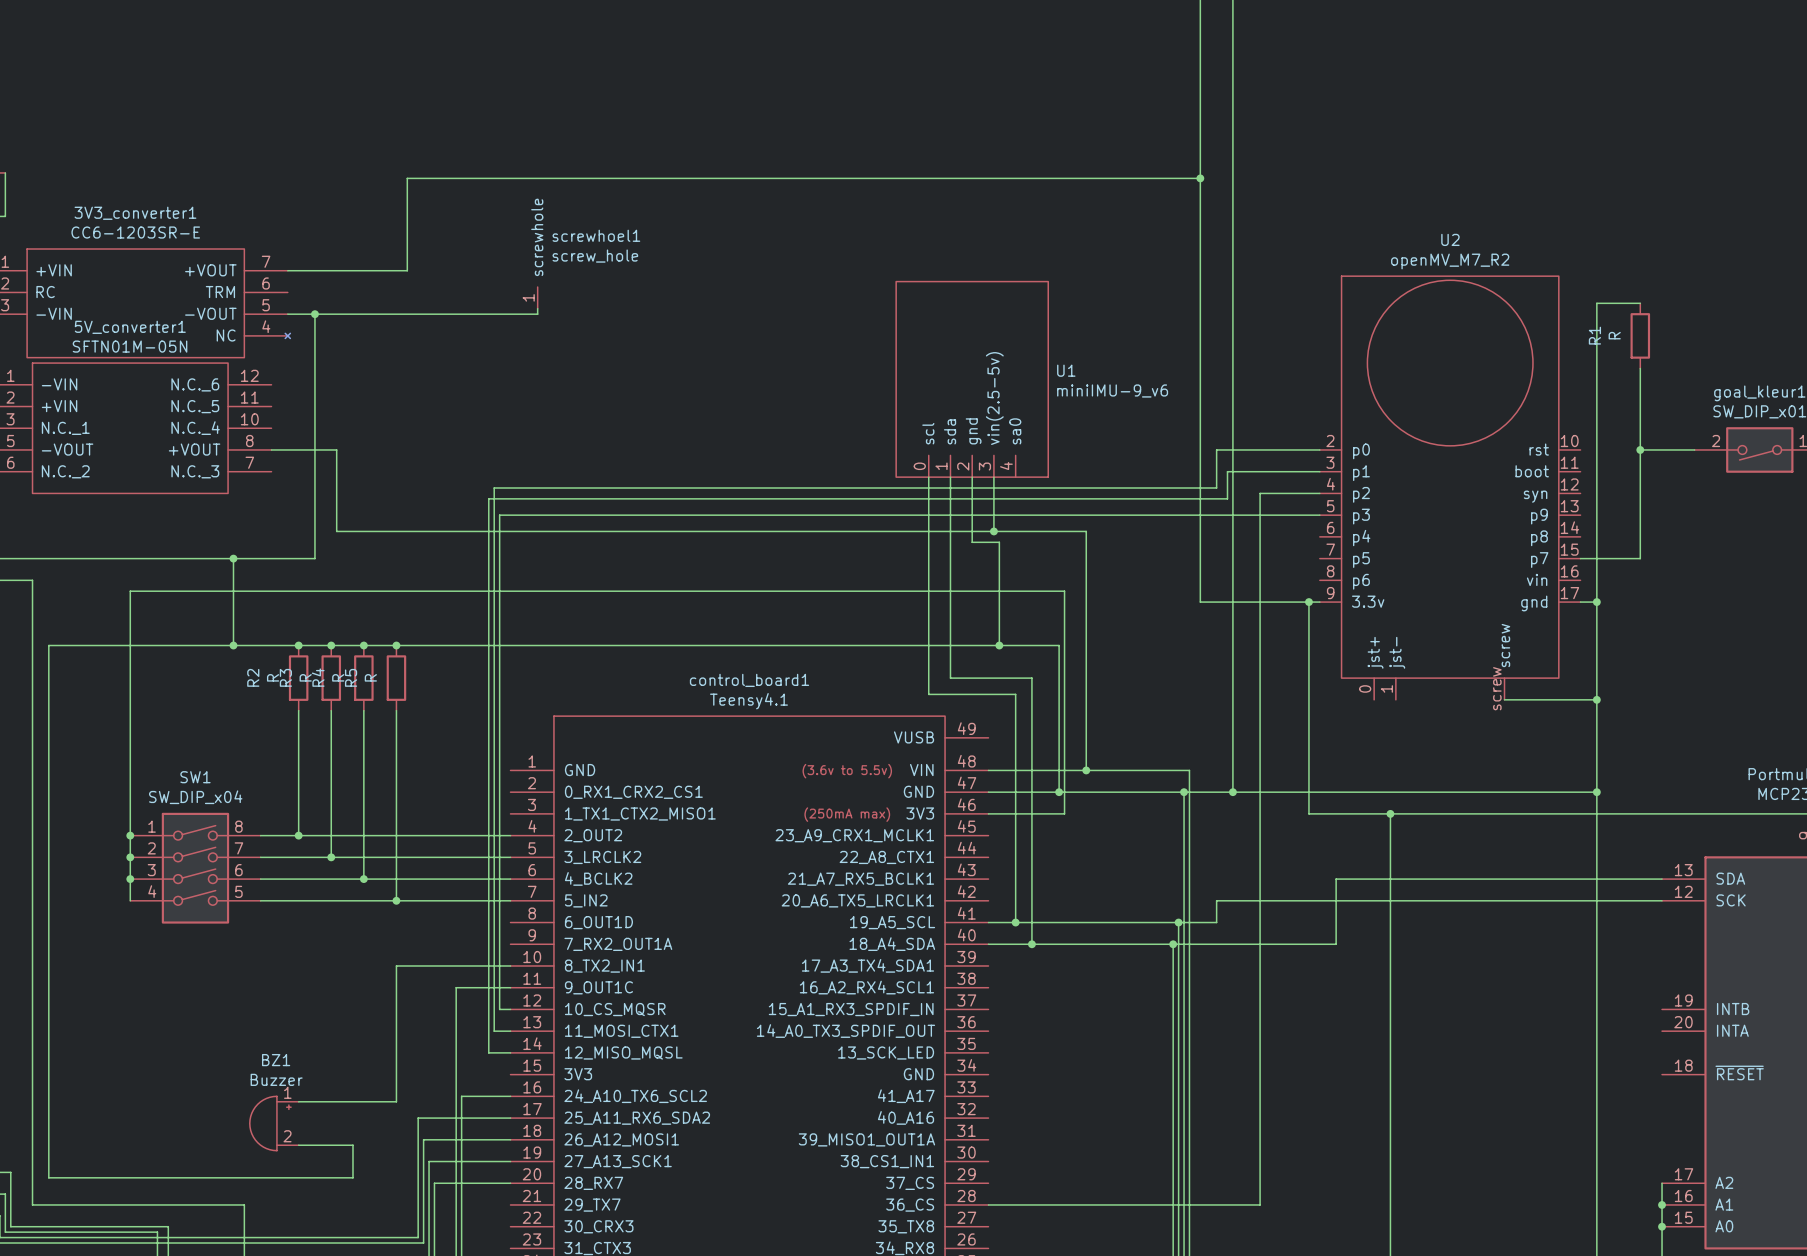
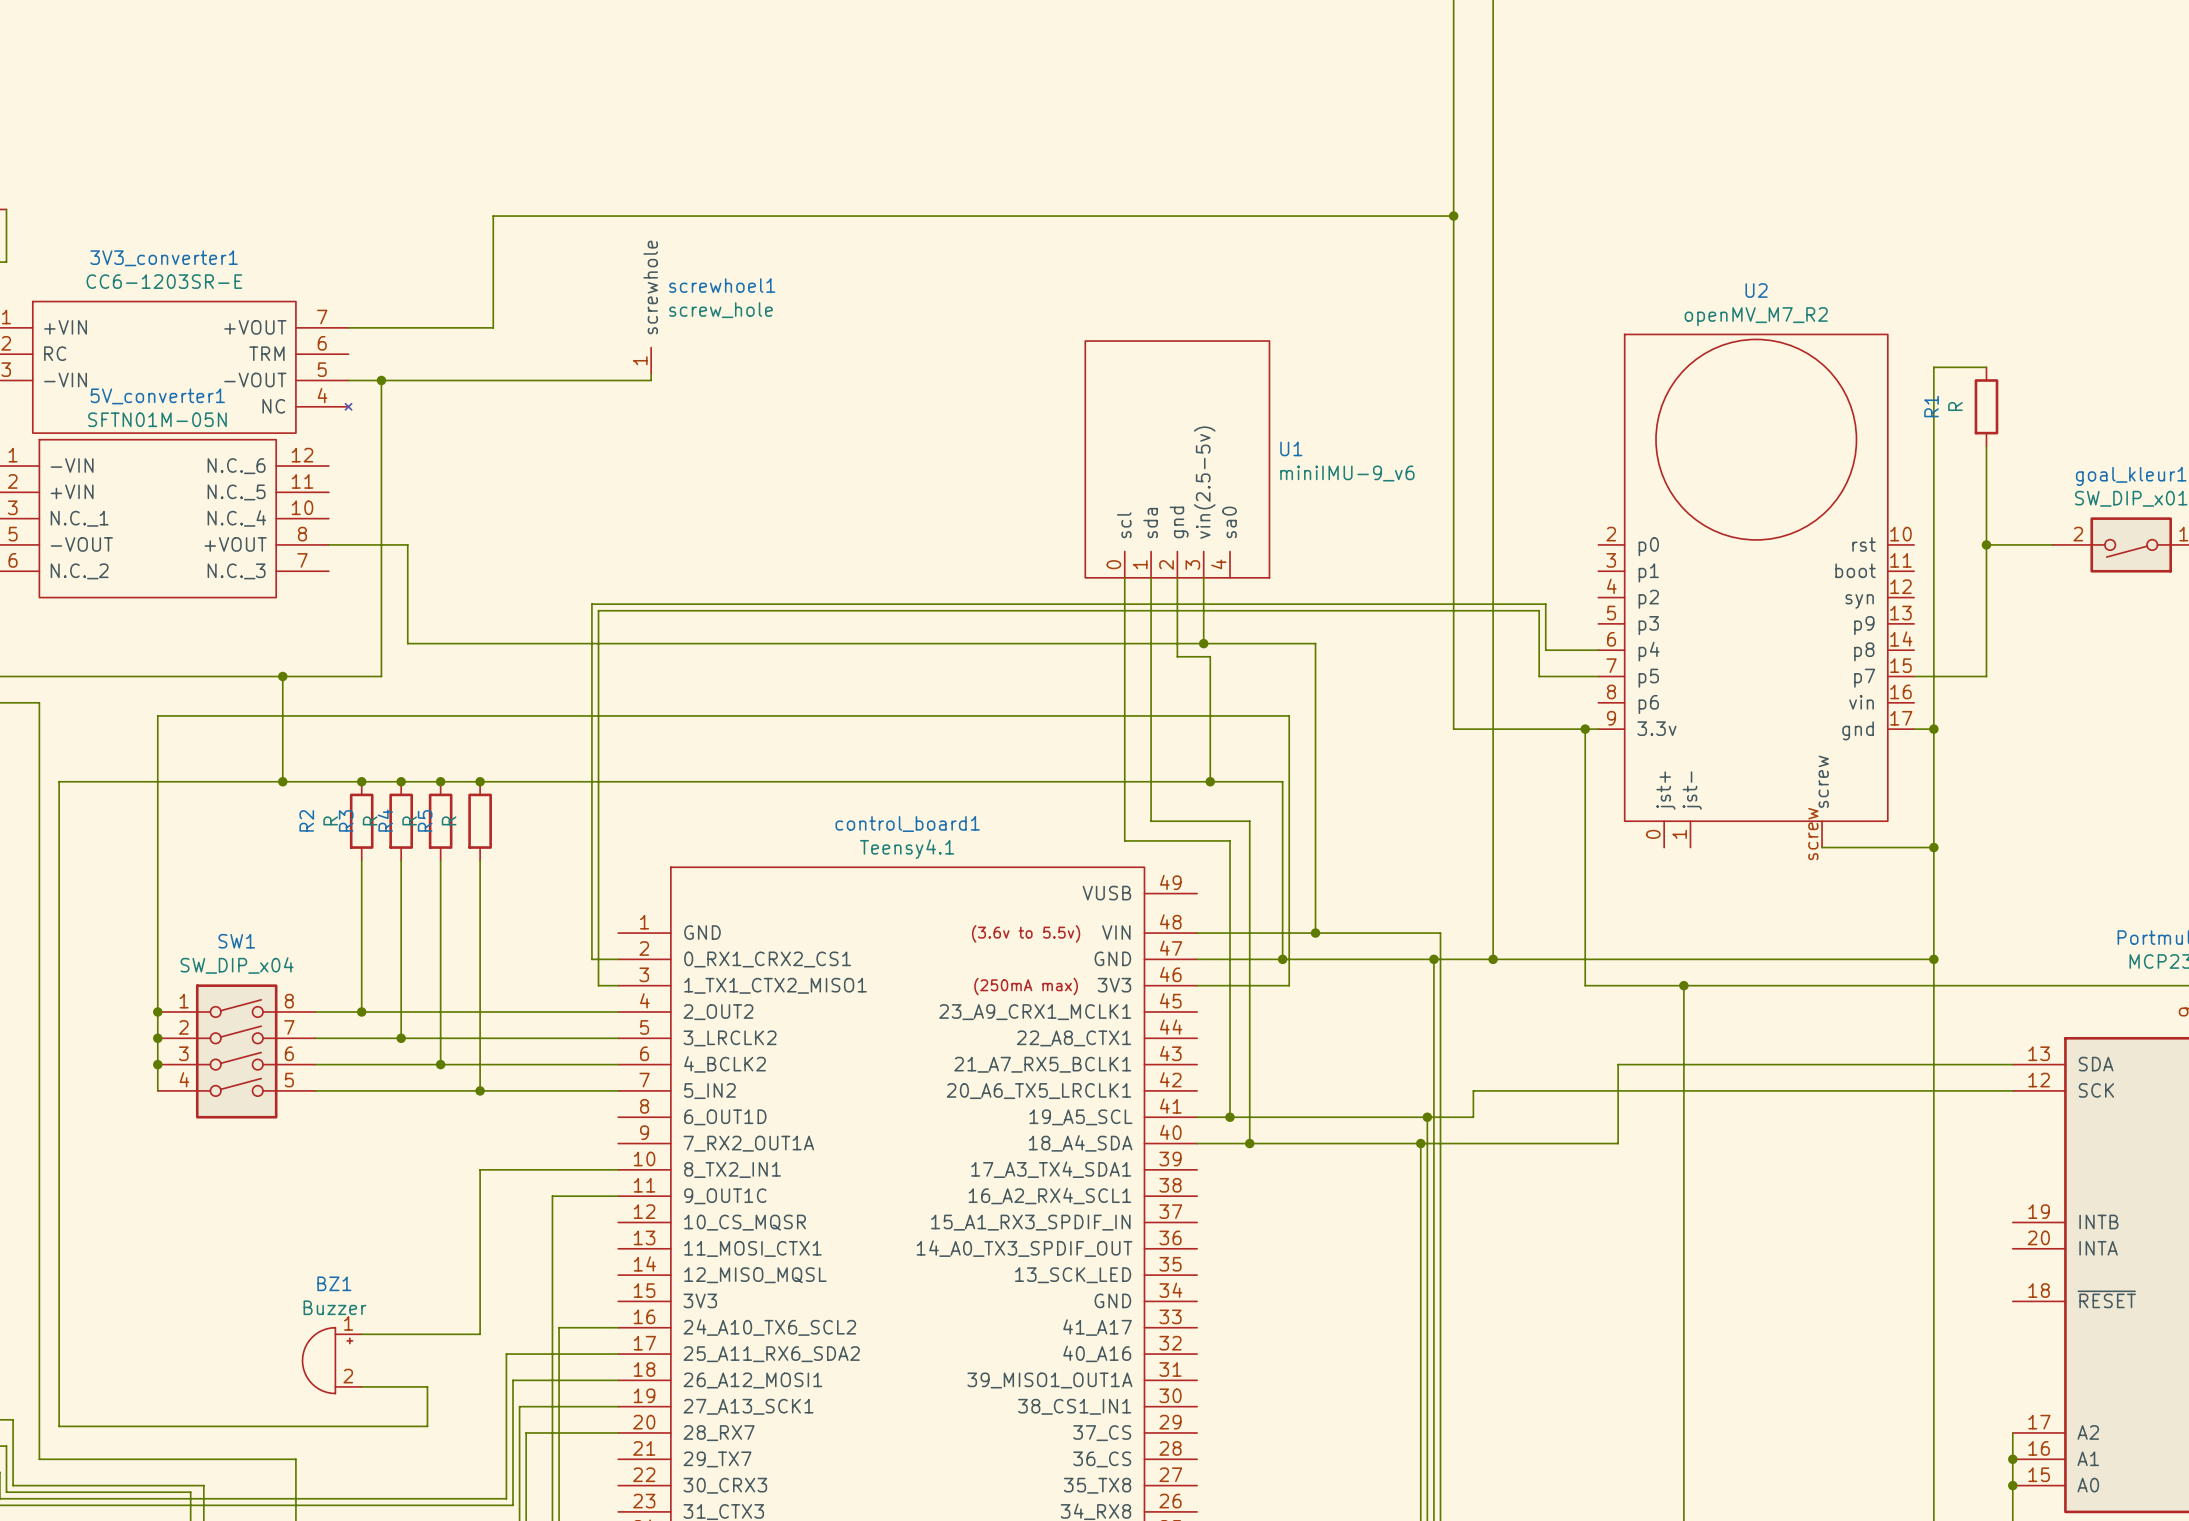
wire: (1319, 449) (1216, 449) (1216, 488) (494, 488) (494, 504) -> (1598, 676) (1539, 676) (1539, 610) (598, 610)
wire: (1319, 471) (1227, 471) (1227, 498) -> (1598, 650) (1545, 650) (1545, 604) (1486, 604)
wire: (1319, 493) (1260, 493) (1260, 1204) (988, 1204) -> none
wire: (1319, 515) (499, 515) (499, 1009) (510, 1009) -> none
wire: (488, 792) (488, 1052) (510, 1052) -> (591, 959) (618, 959)
wire: (494, 813) (494, 1031) (510, 1031) -> (598, 985) (618, 985)

